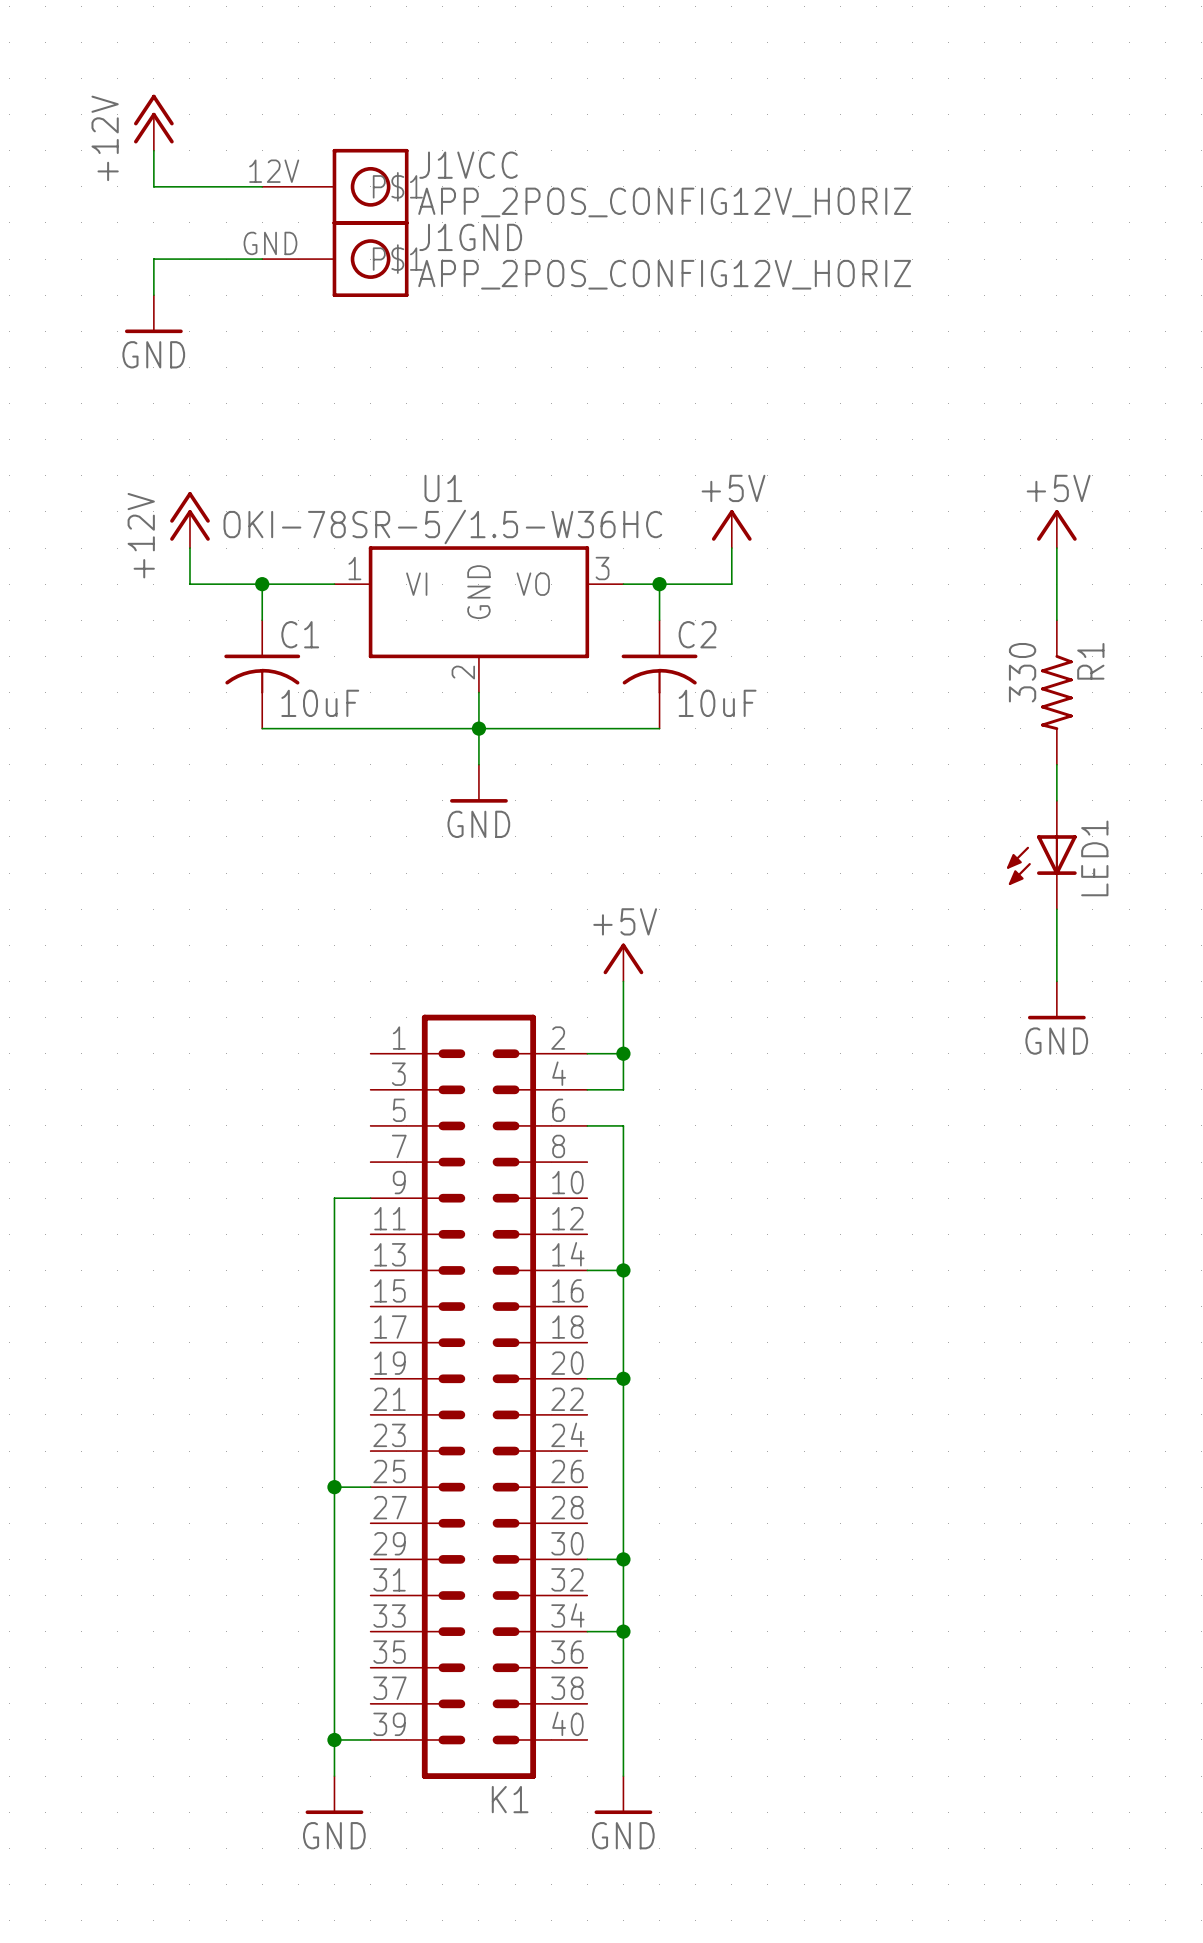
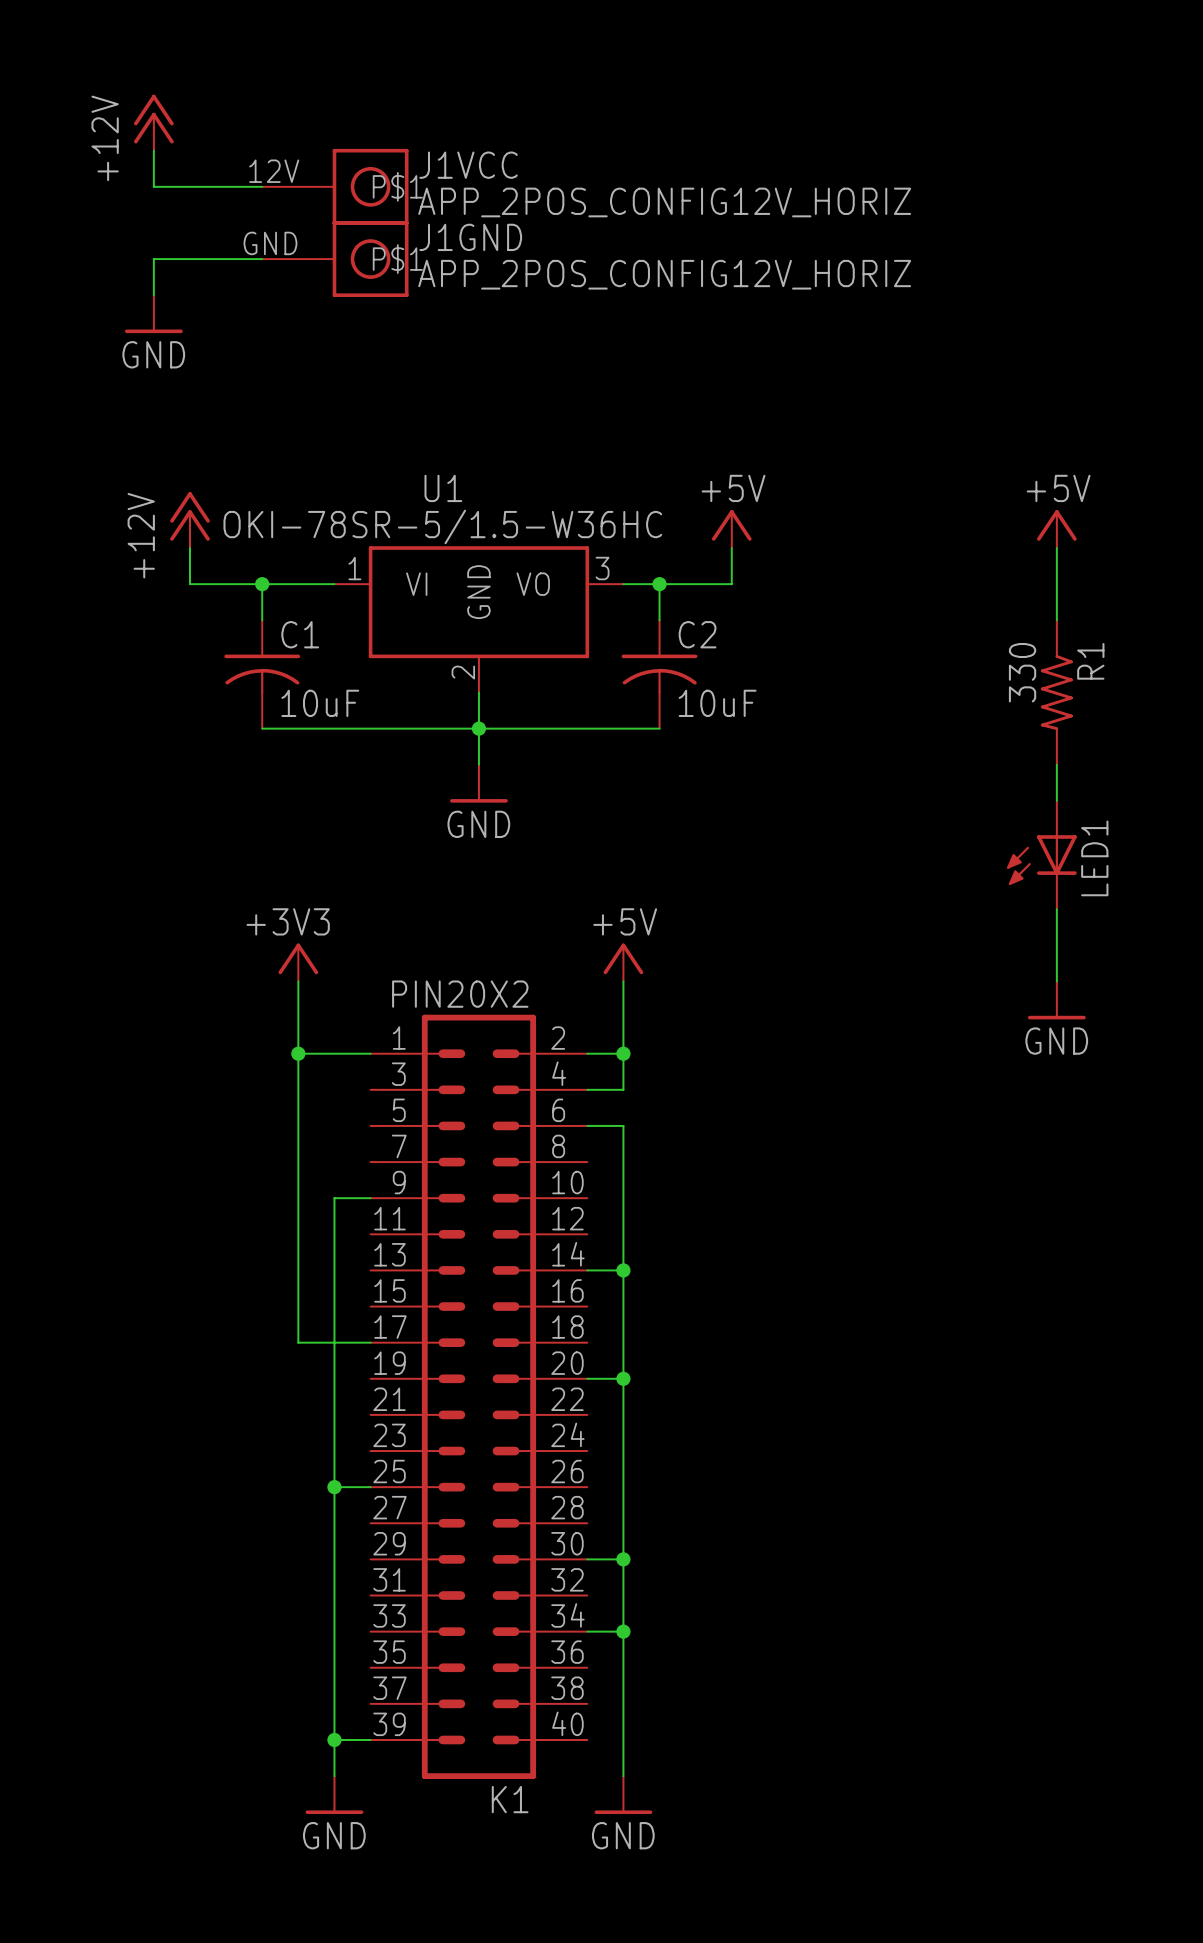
power symbol: none -> +3V3 (298, 962)
wire: none -> (298, 981) (298, 1342) (370, 1342)
K1 value: none -> PIN20X2 (460, 994)
wire: none -> (298, 1053) (370, 1053)
junction: none -> (298, 1053)

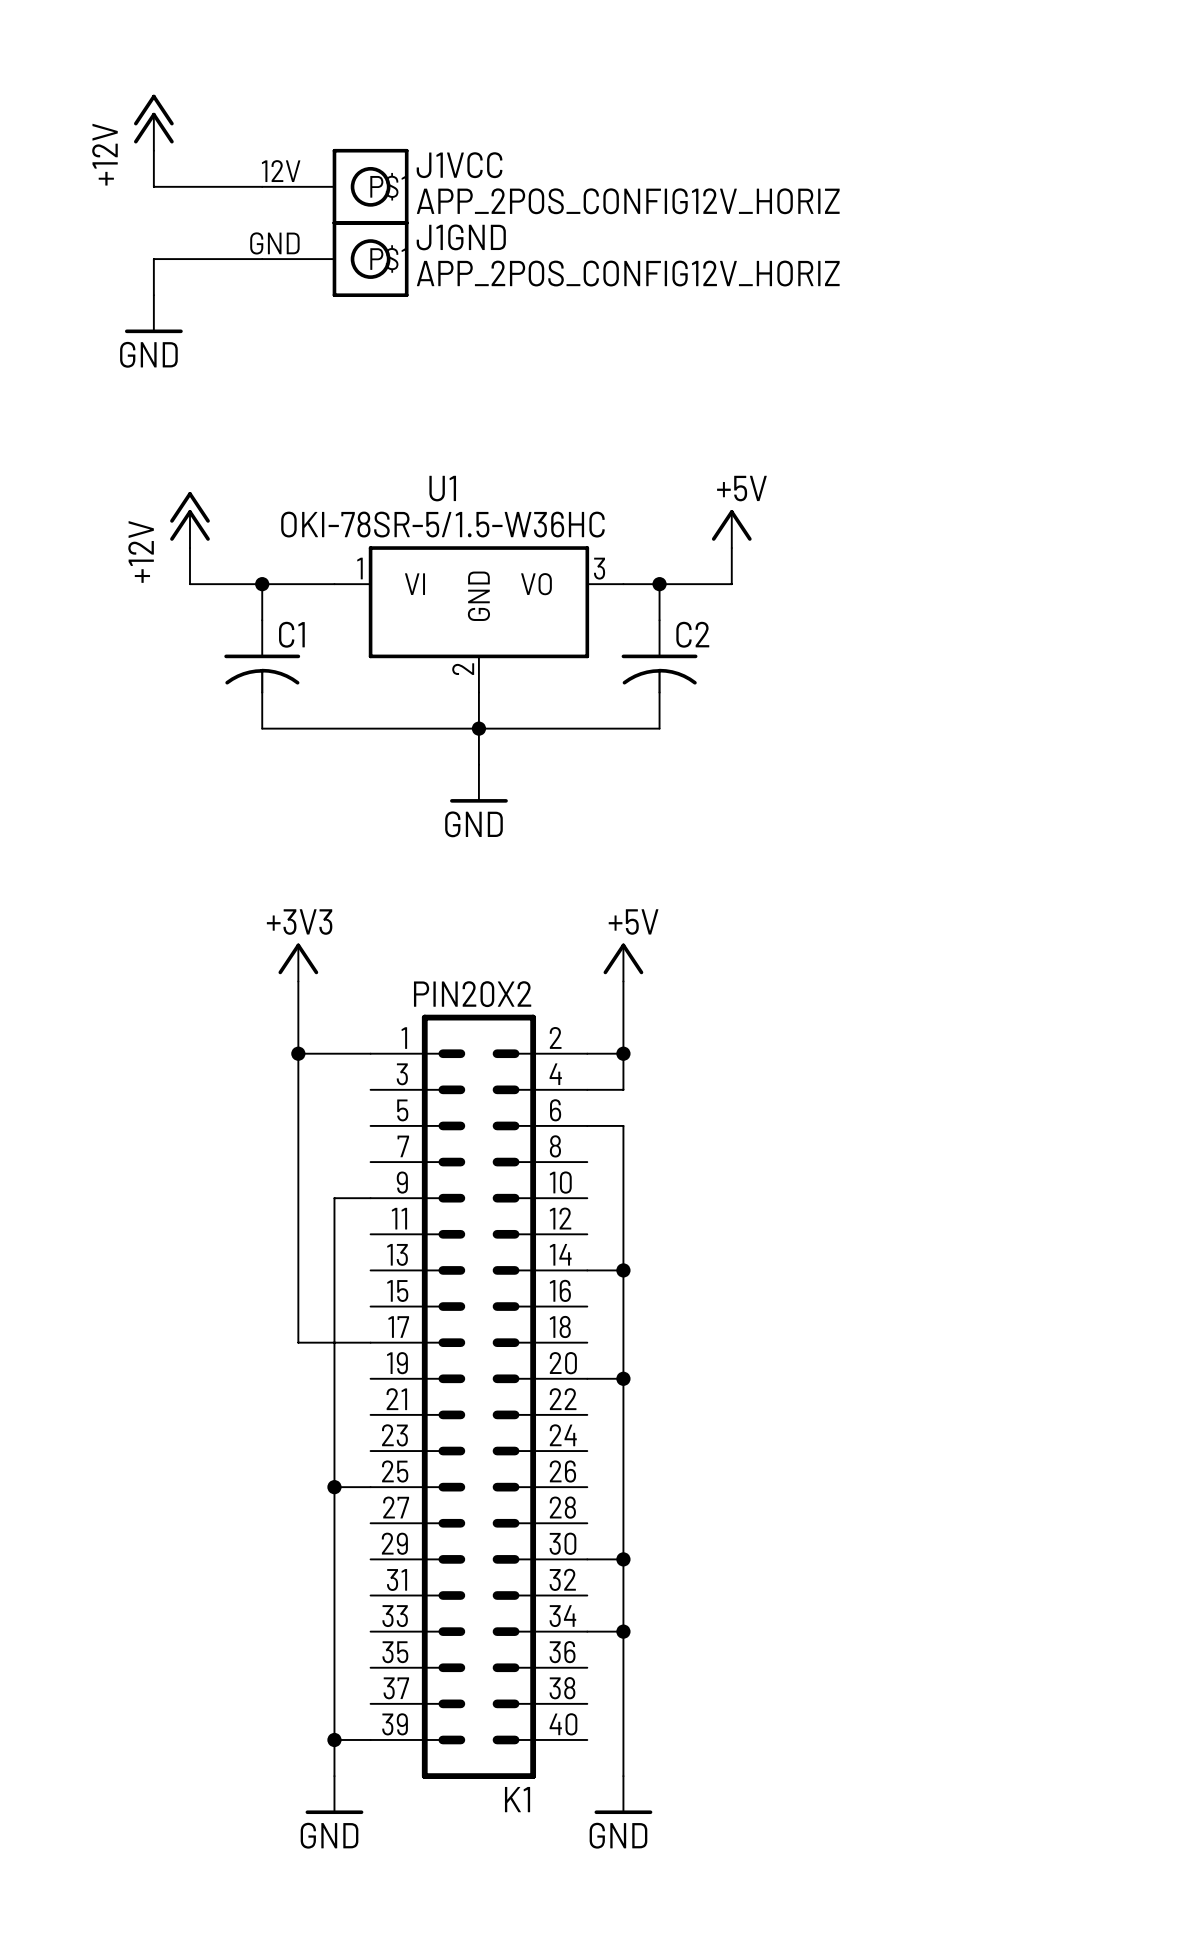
power symbol: +5V (1056, 529) -> none
wire: (1056, 548) (1056, 620) -> none
R1: 330 (1056, 692) -> none
C1 value: 10uF (320, 703) -> none
C2 value: 10uF (717, 703) -> none
wire: (1056, 764) (1056, 800) -> none
LED1: (1041, 855) -> none
wire: (1056, 909) (1056, 981) -> none
power symbol: GND (1056, 1000) -> none

